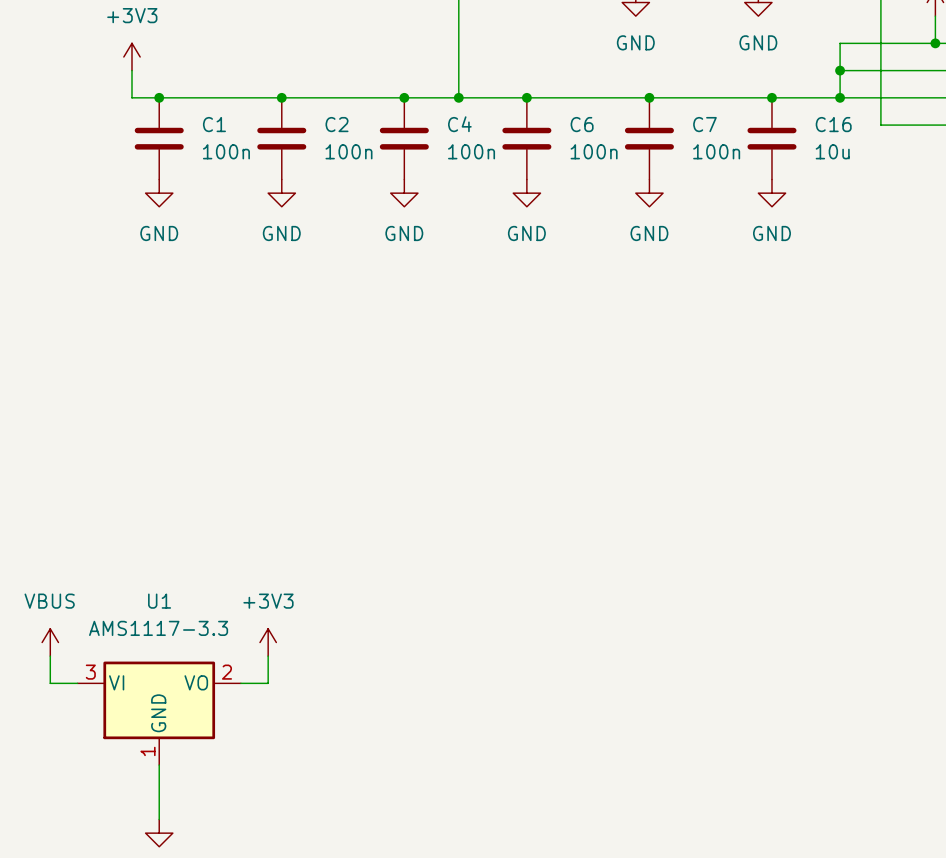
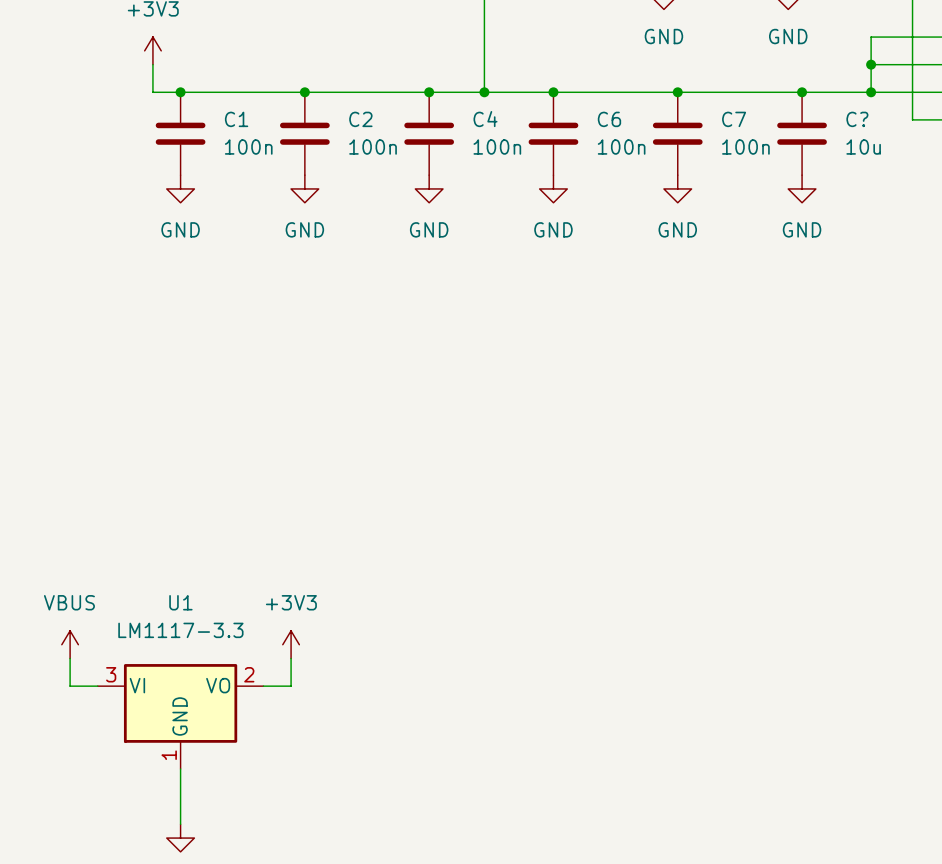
C16 name: C16 (833, 124) -> C? (857, 119)
U1 value: AMS1117-3.3 (158, 628) -> LM1117-3.3 (180, 630)

